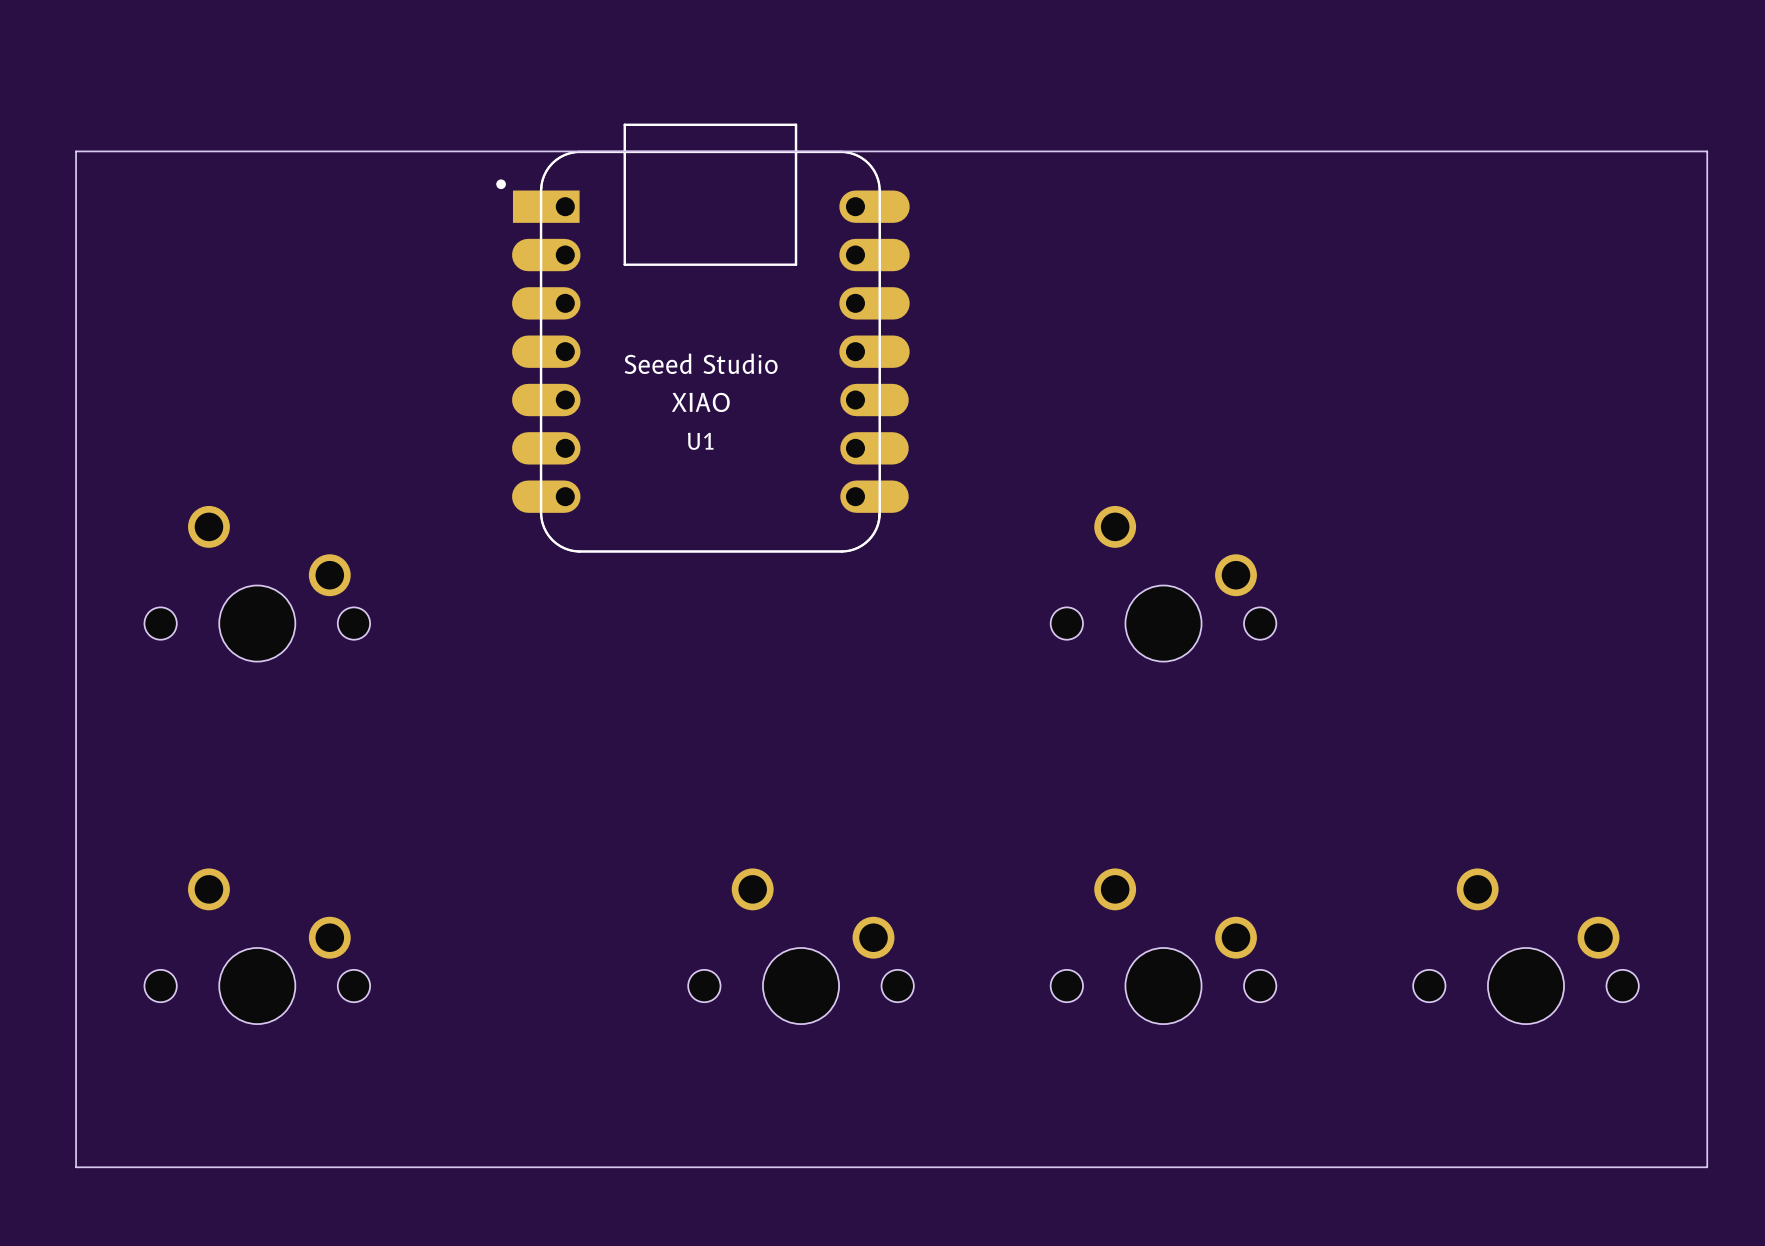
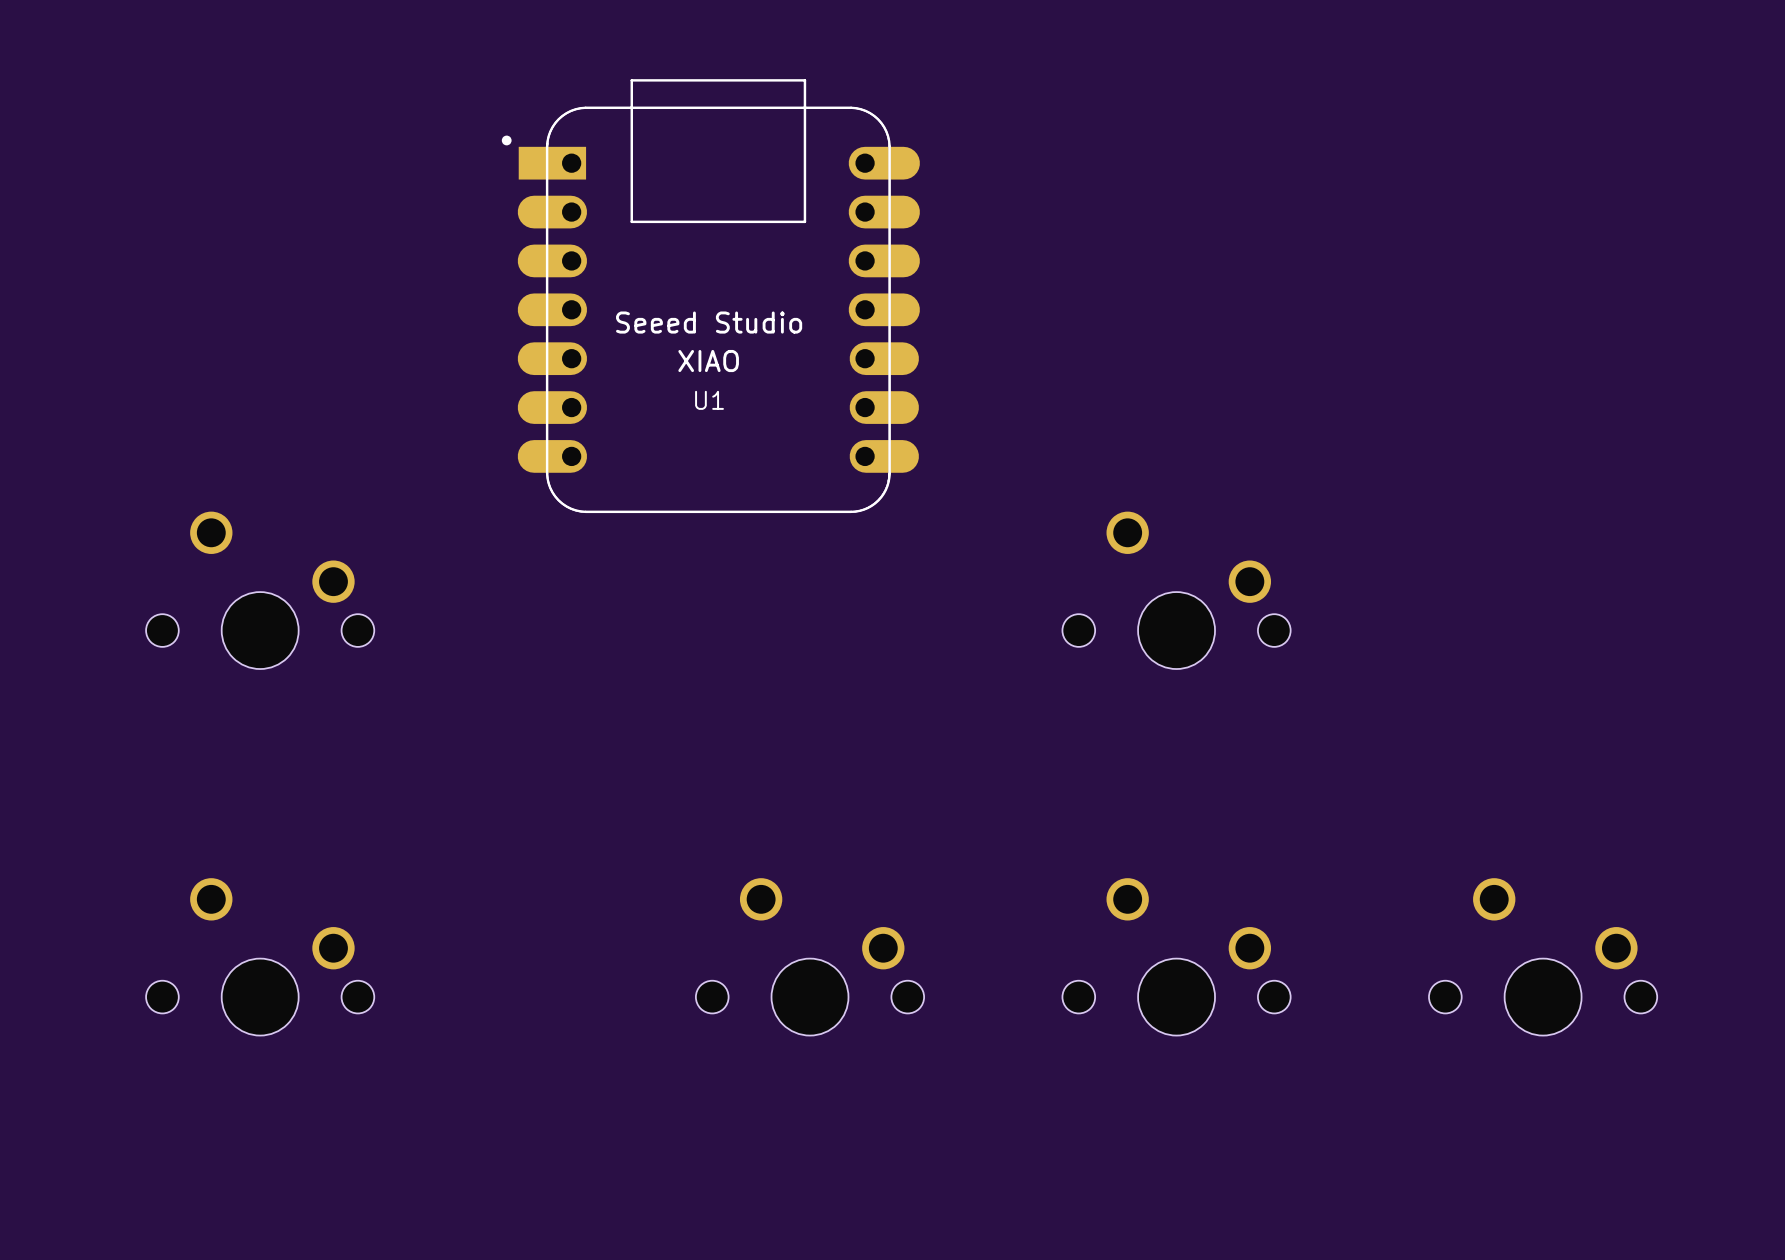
U1 footprint: [496, 123, 910, 553] -> [501, 79, 920, 514]
board edge: (1707, 151) (76, 151) (76, 1167) (1707, 1167) (1707, 151) -> none

